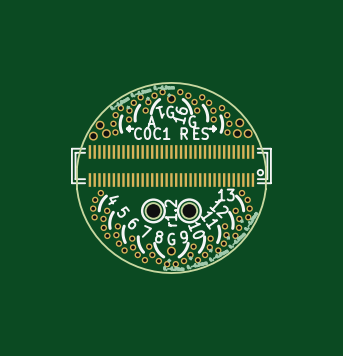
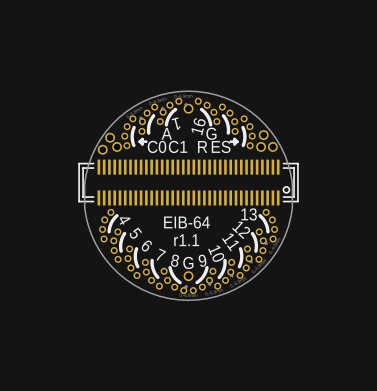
text: G (170, 112) -> none
drawing: [140, 198, 202, 224] -> none
text: none -> EIB-64 (186, 222)
hole: (153, 210) -> none
hole: (189, 210) -> none
text: r1.2 (170, 213) -> r1.1 (186, 240)

